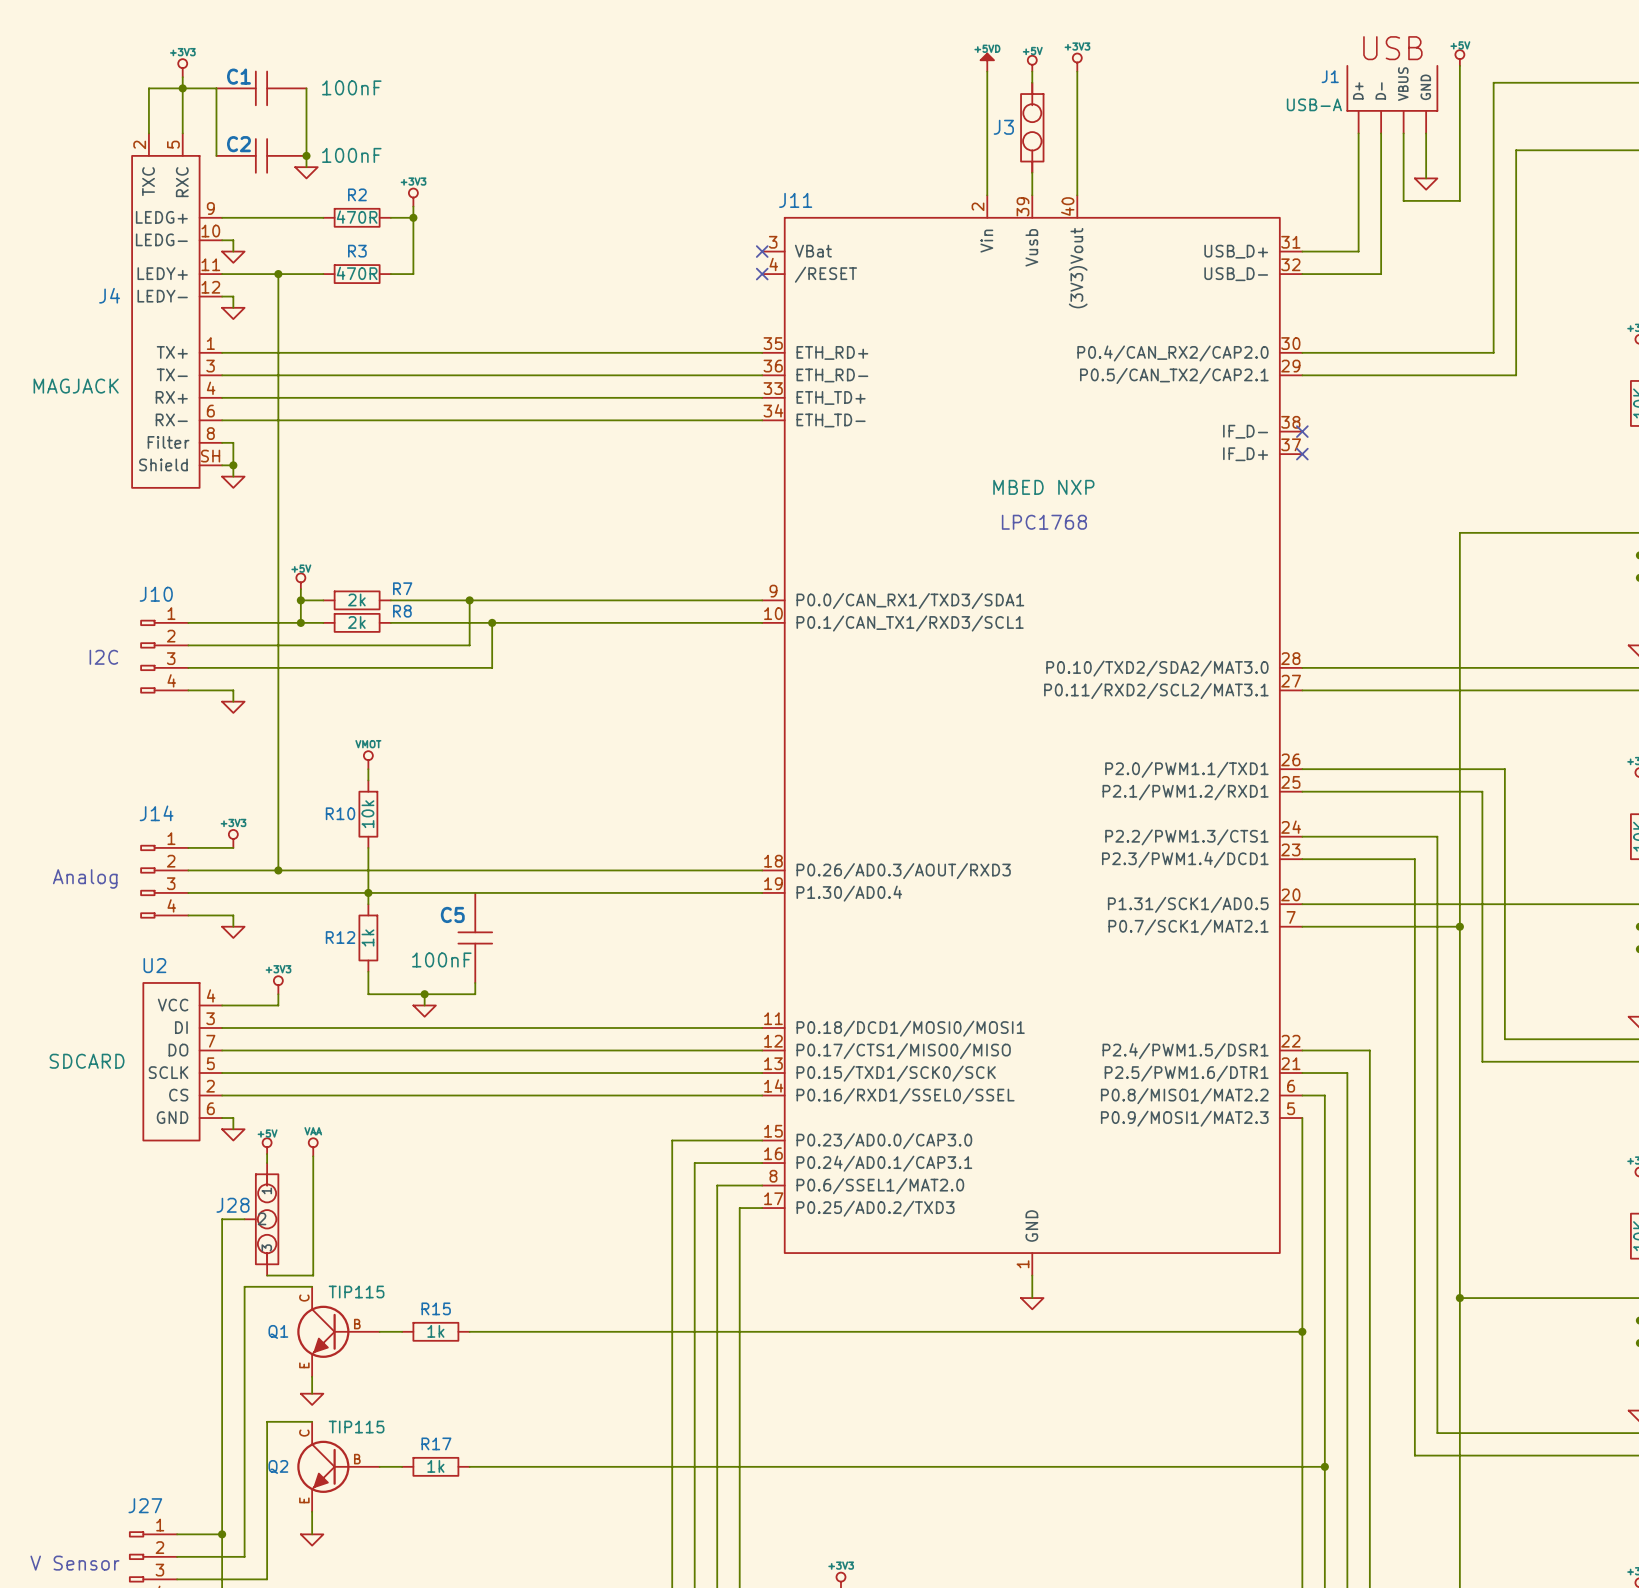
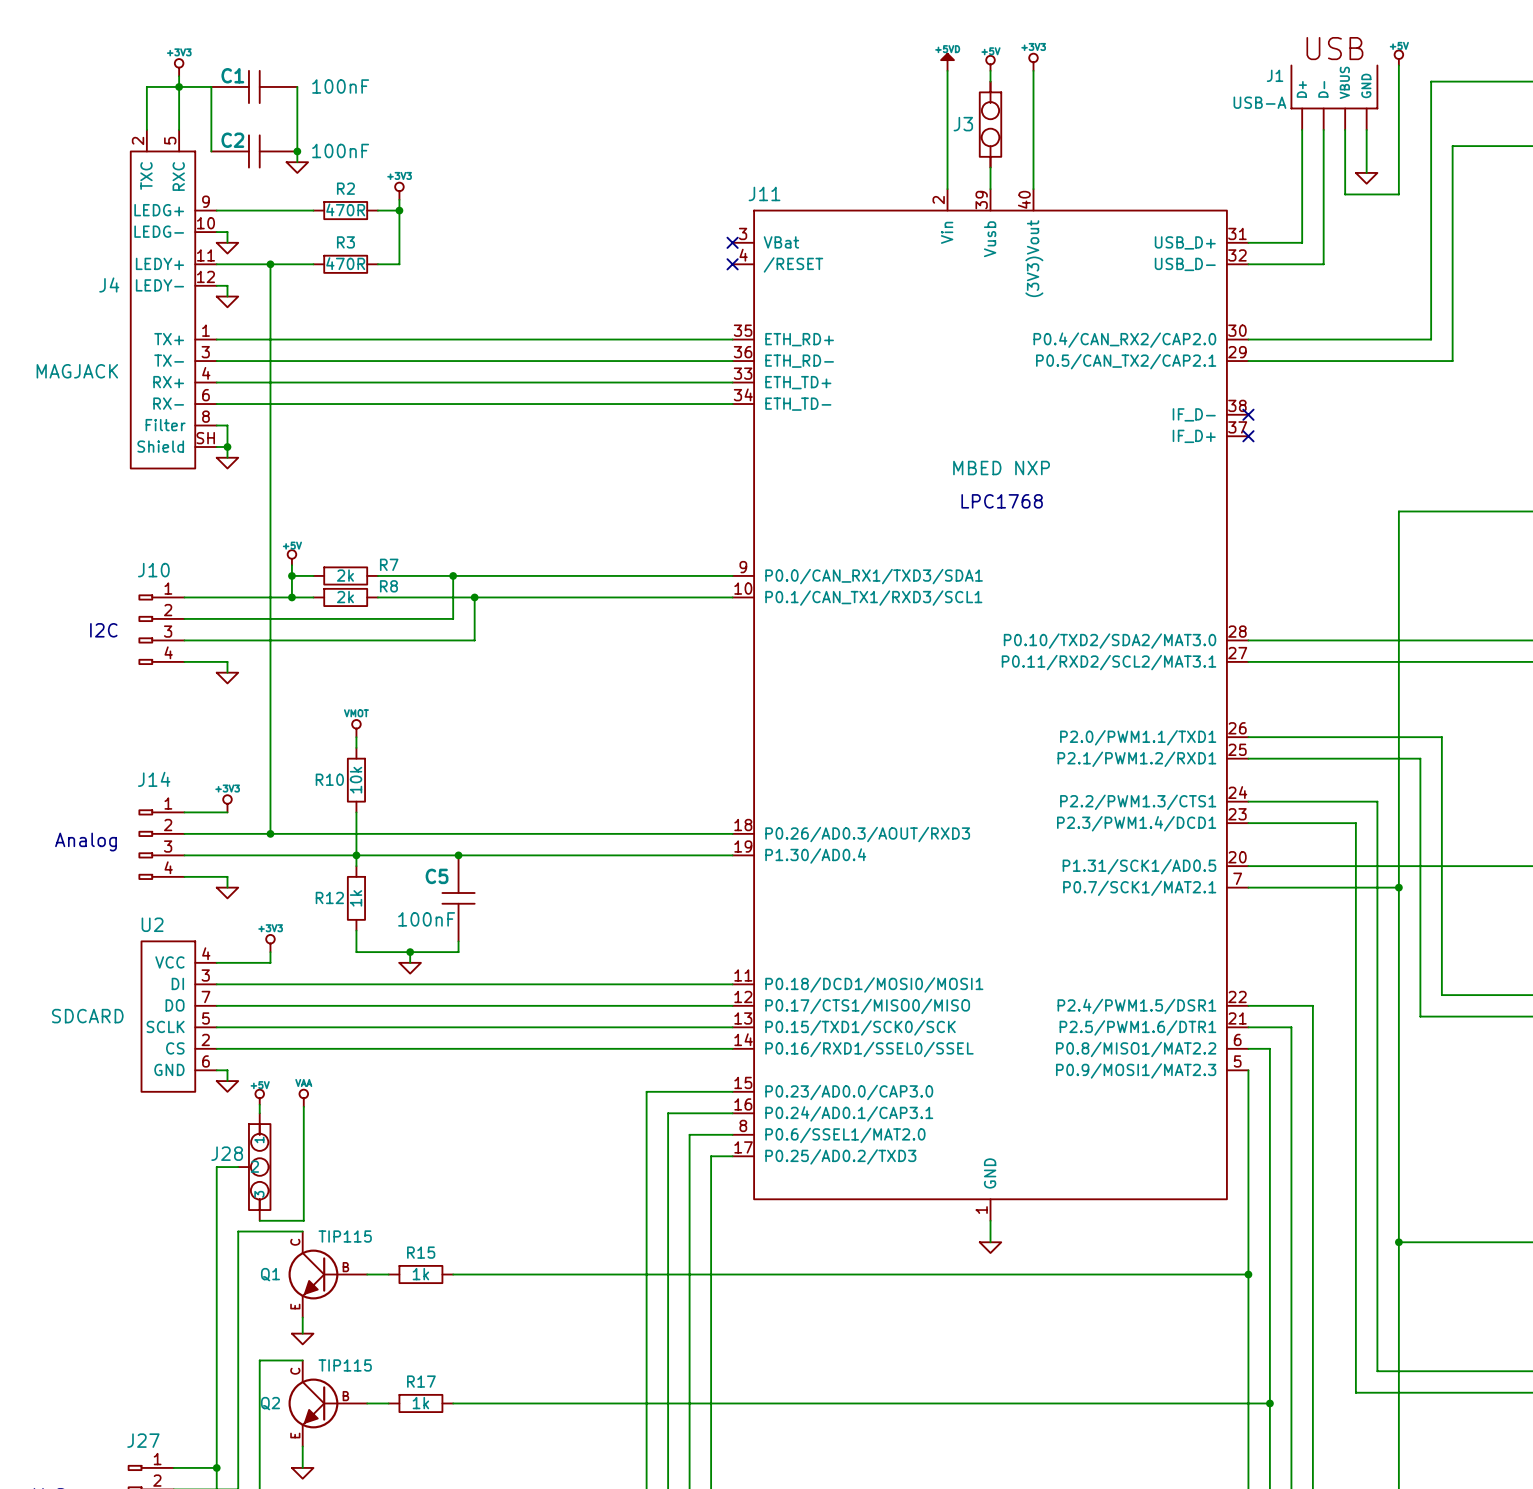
junction: none -> (458, 855)

